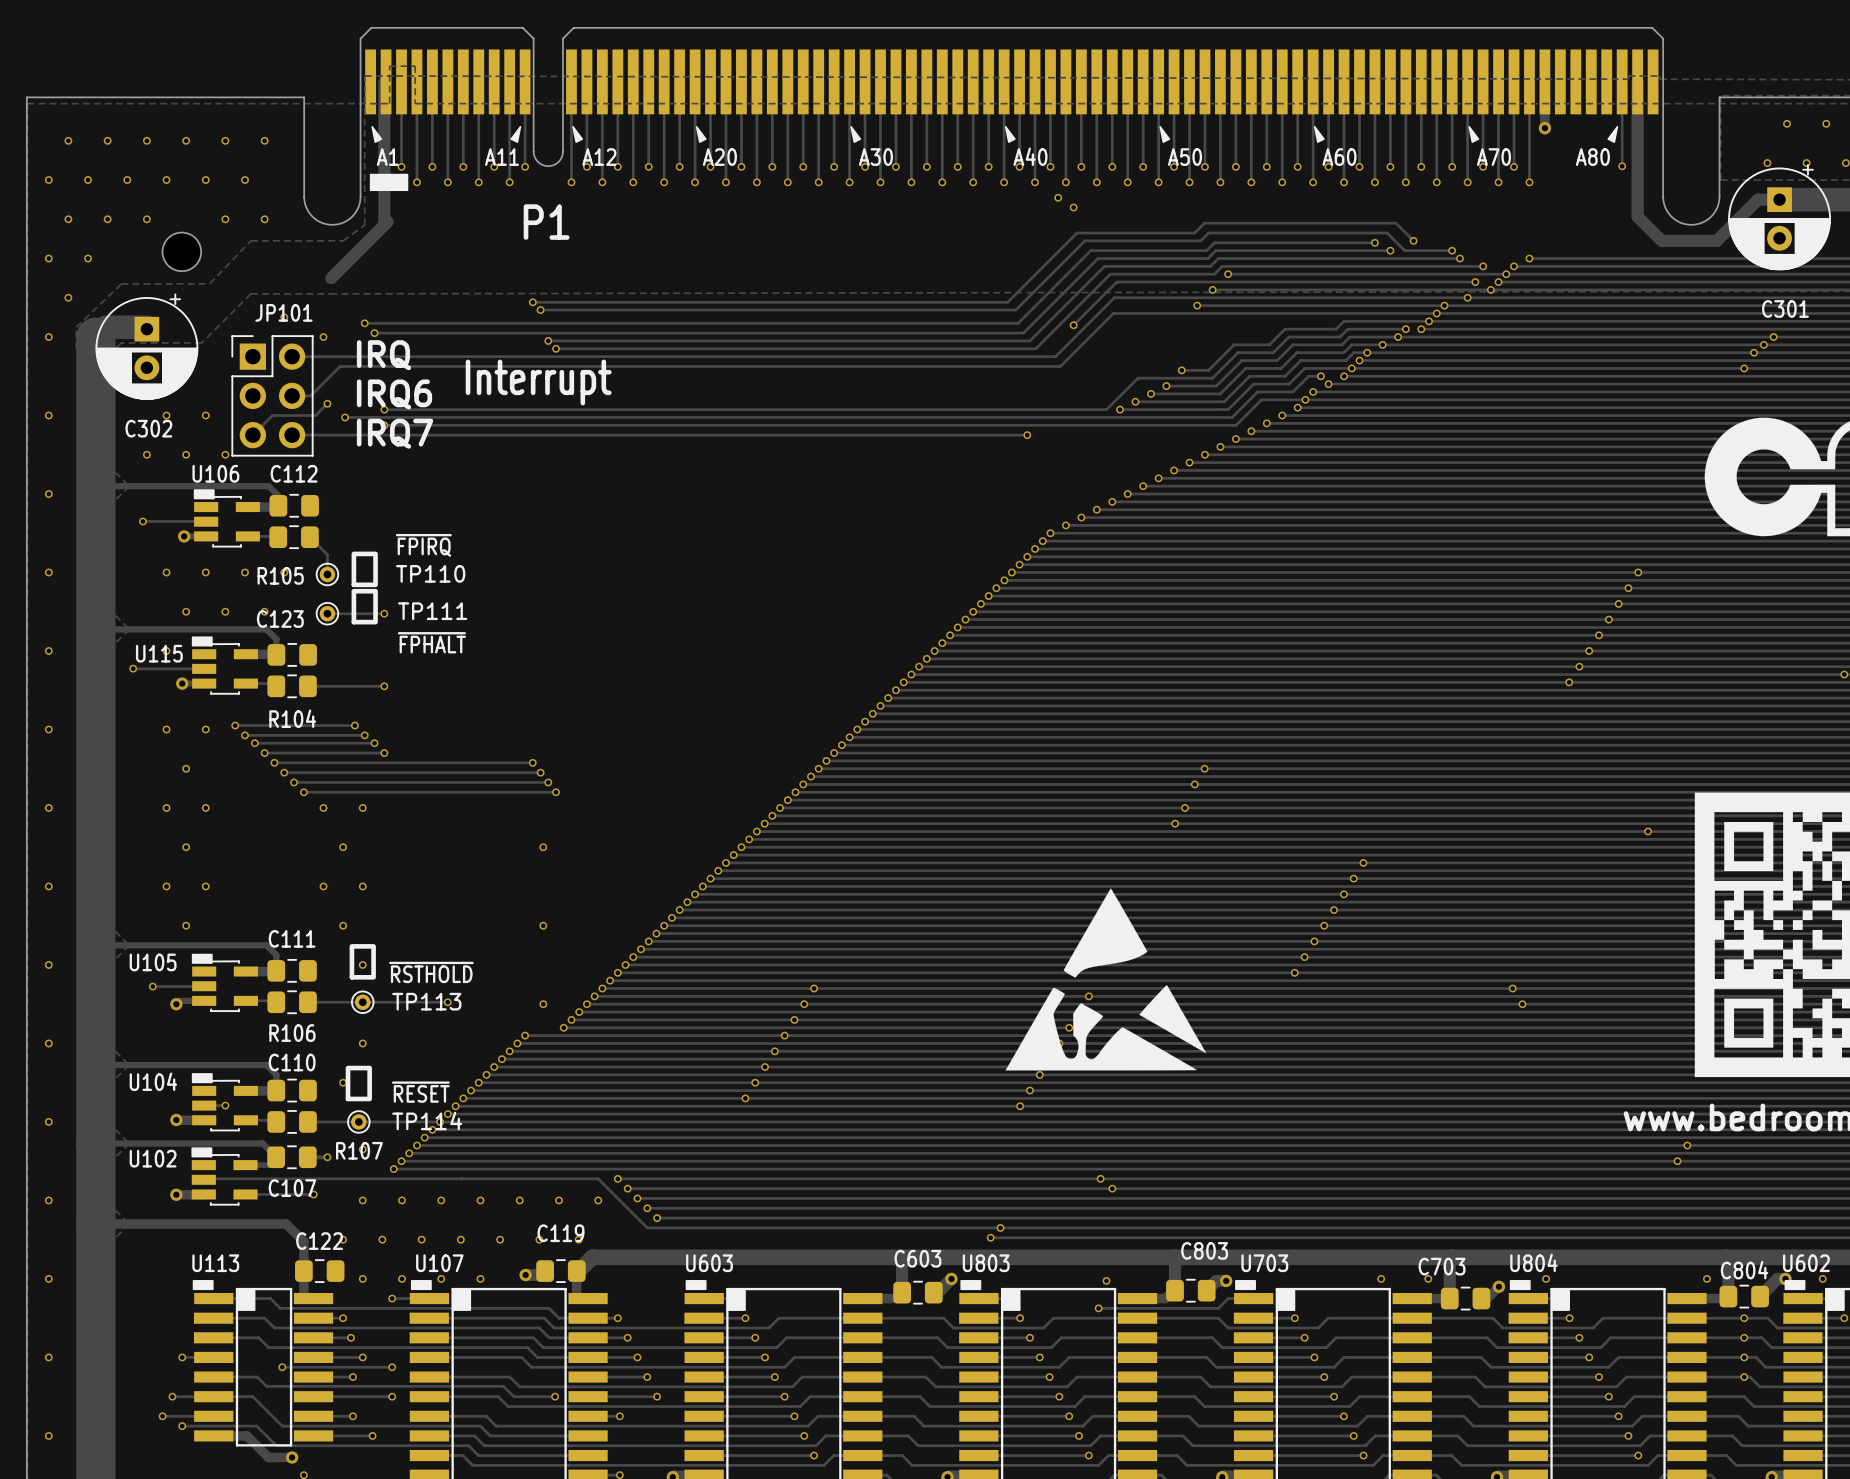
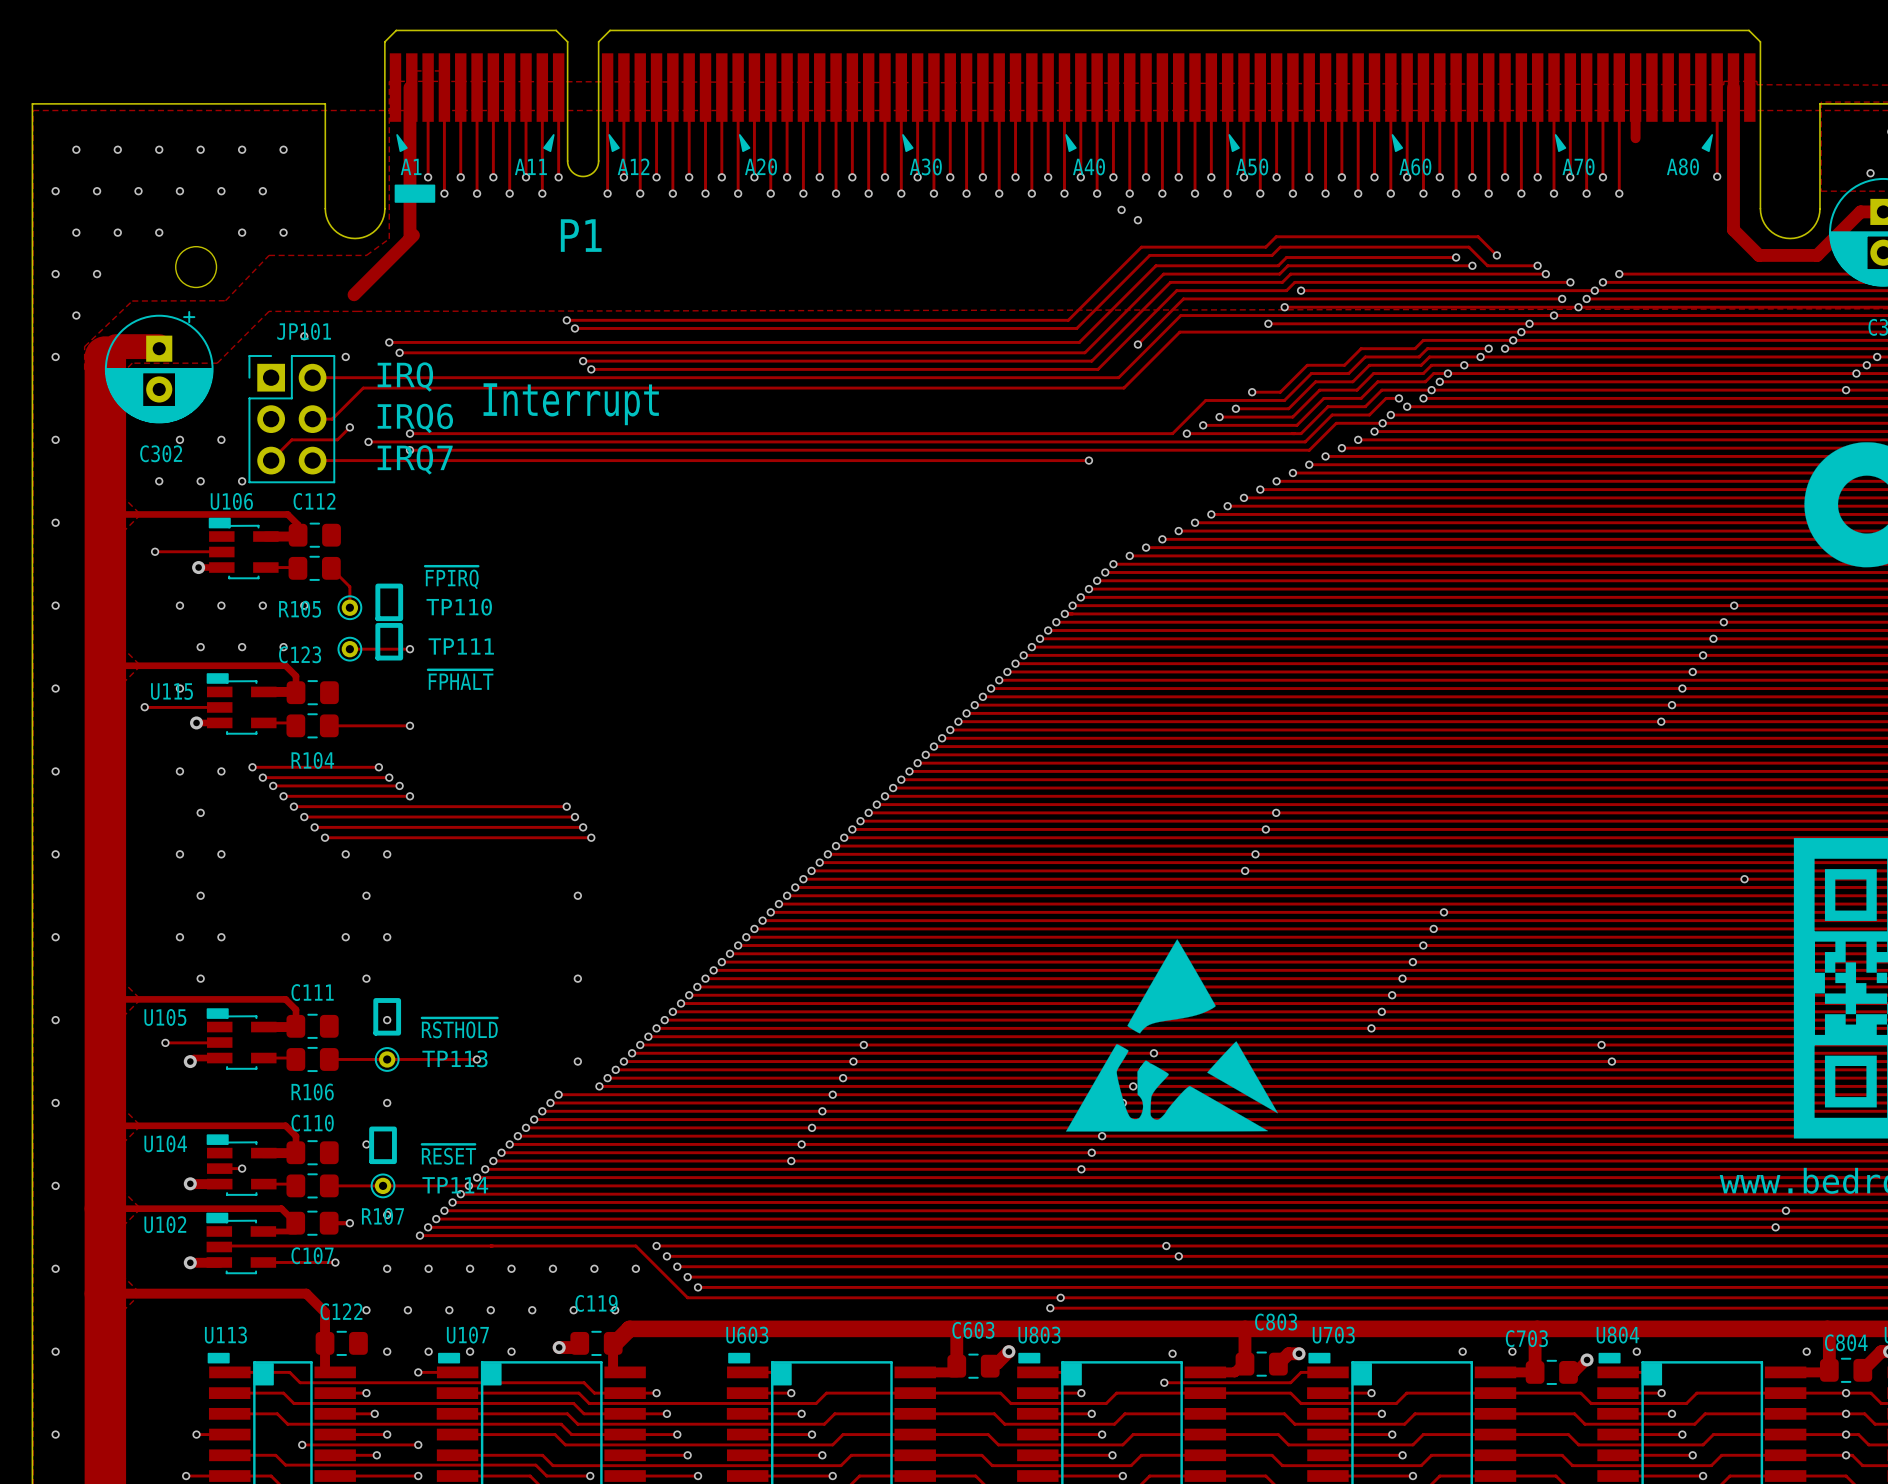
via: (1544, 128) -> none

